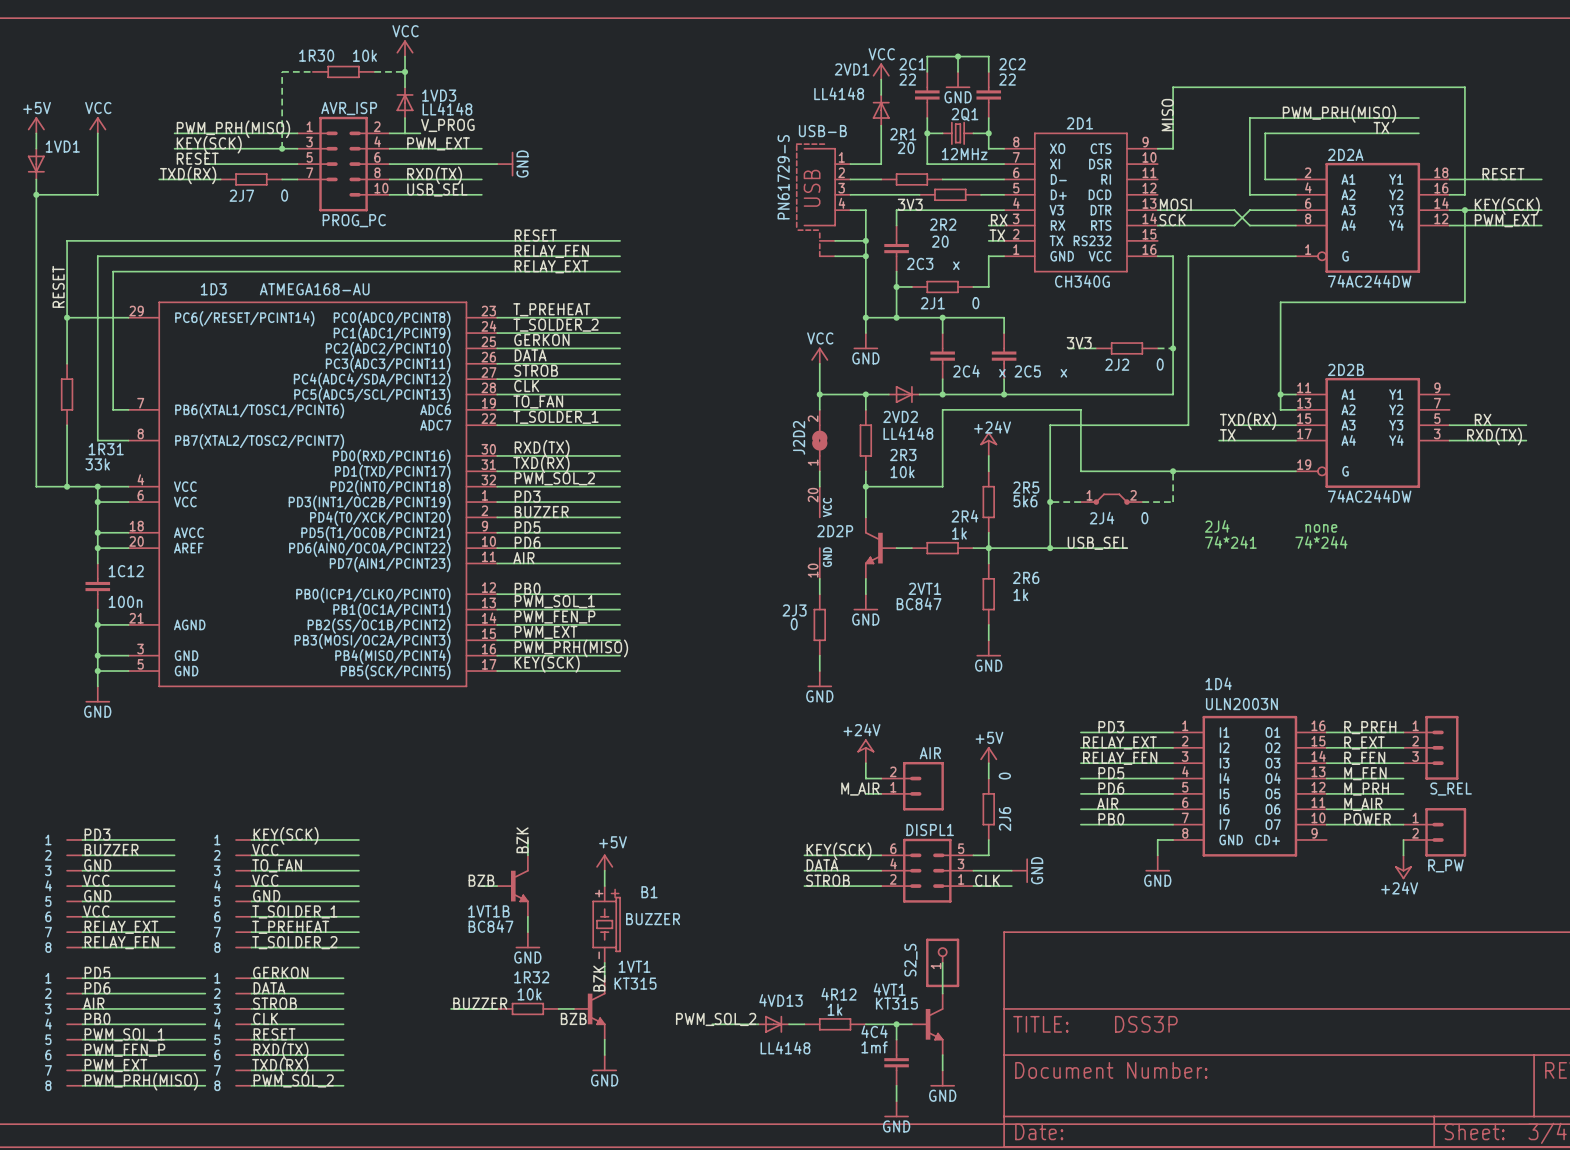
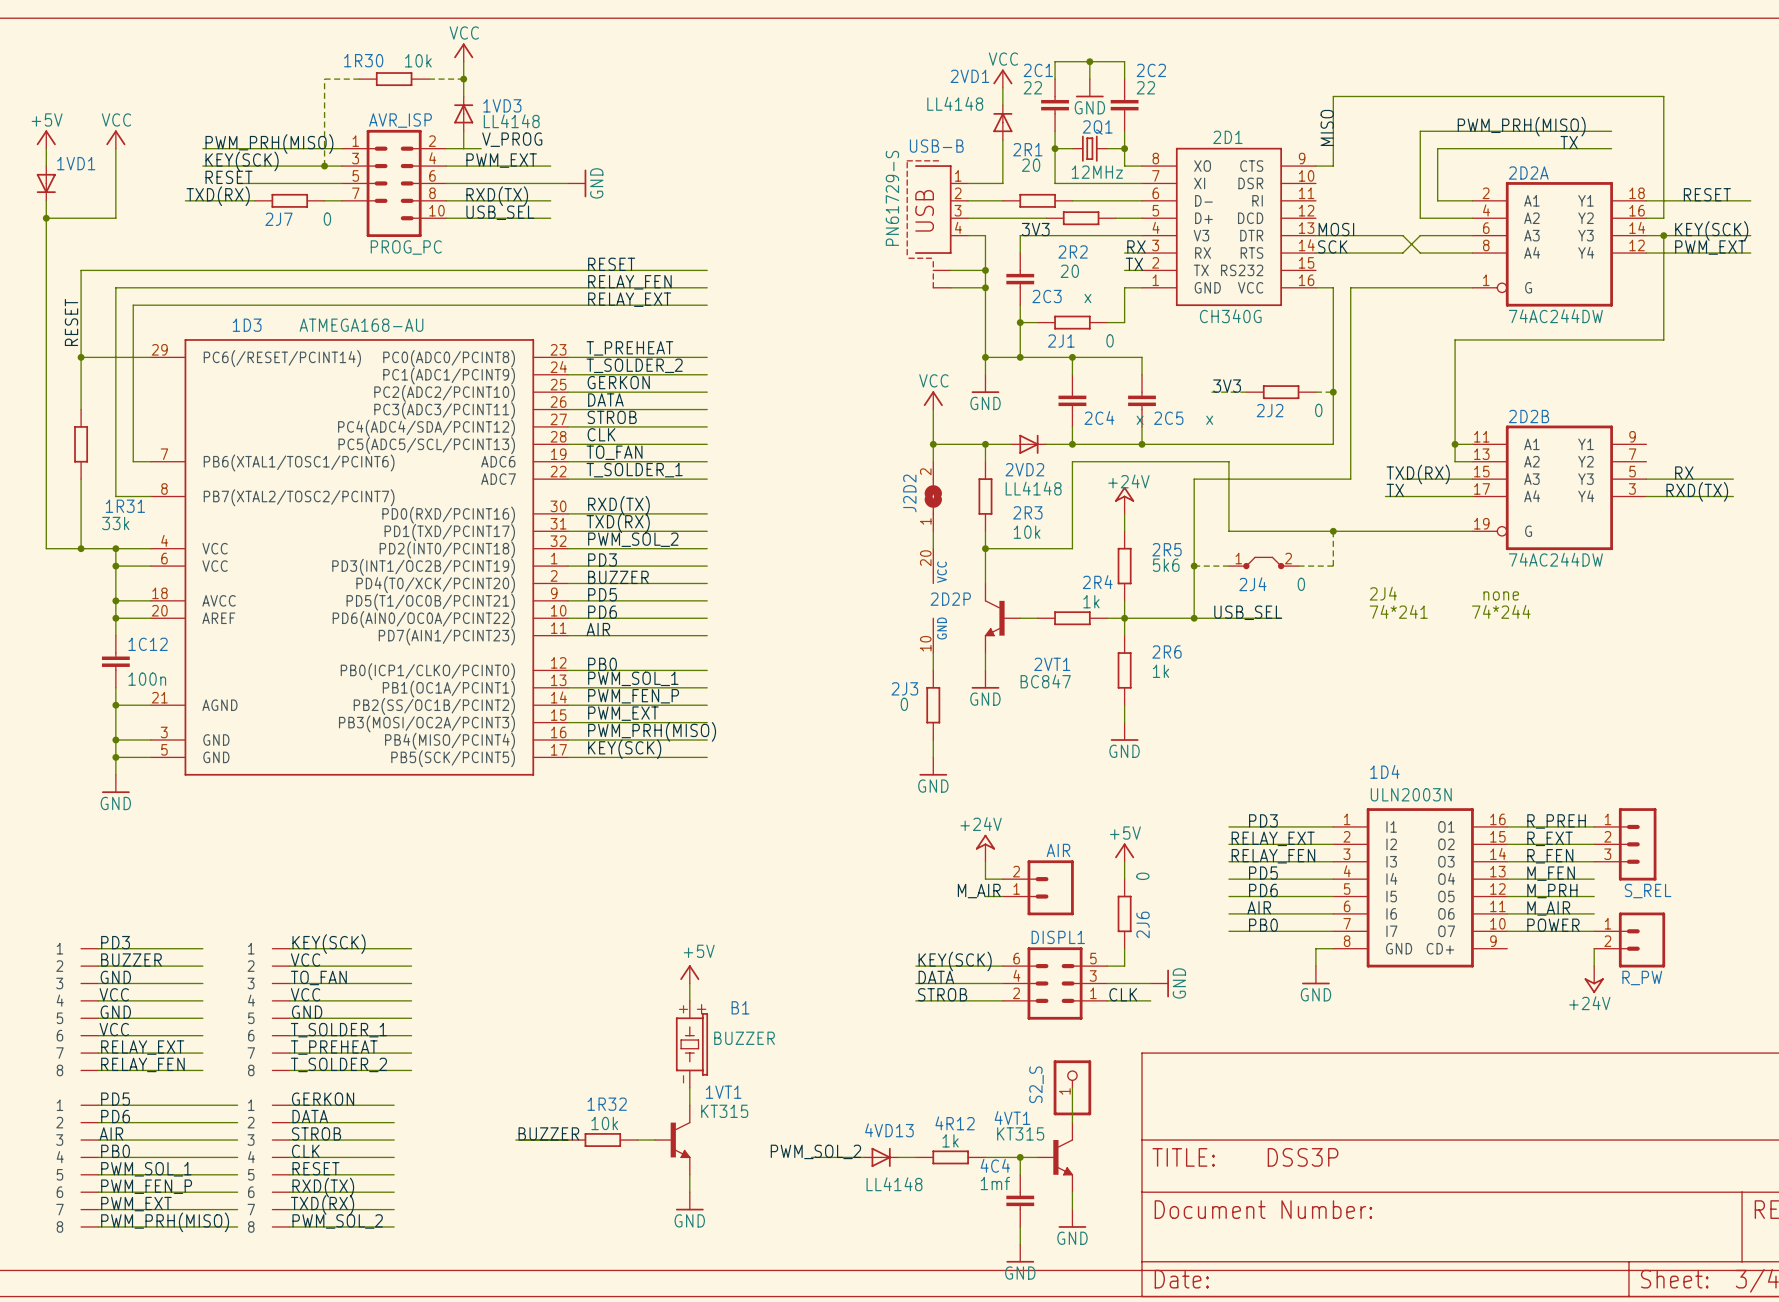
wire: (527, 839) (527, 855) -> none
label: BZK (522, 840) -> none
label: BZB (481, 880) -> none
wire: (481, 886) (497, 886) -> none
1VT1B: BC847 (512, 886) -> none
wire: (527, 916) (527, 932) -> none
power symbol: GND (527, 940) -> none
label: BZK (599, 978) -> none
label: BZB (573, 1018) -> none

